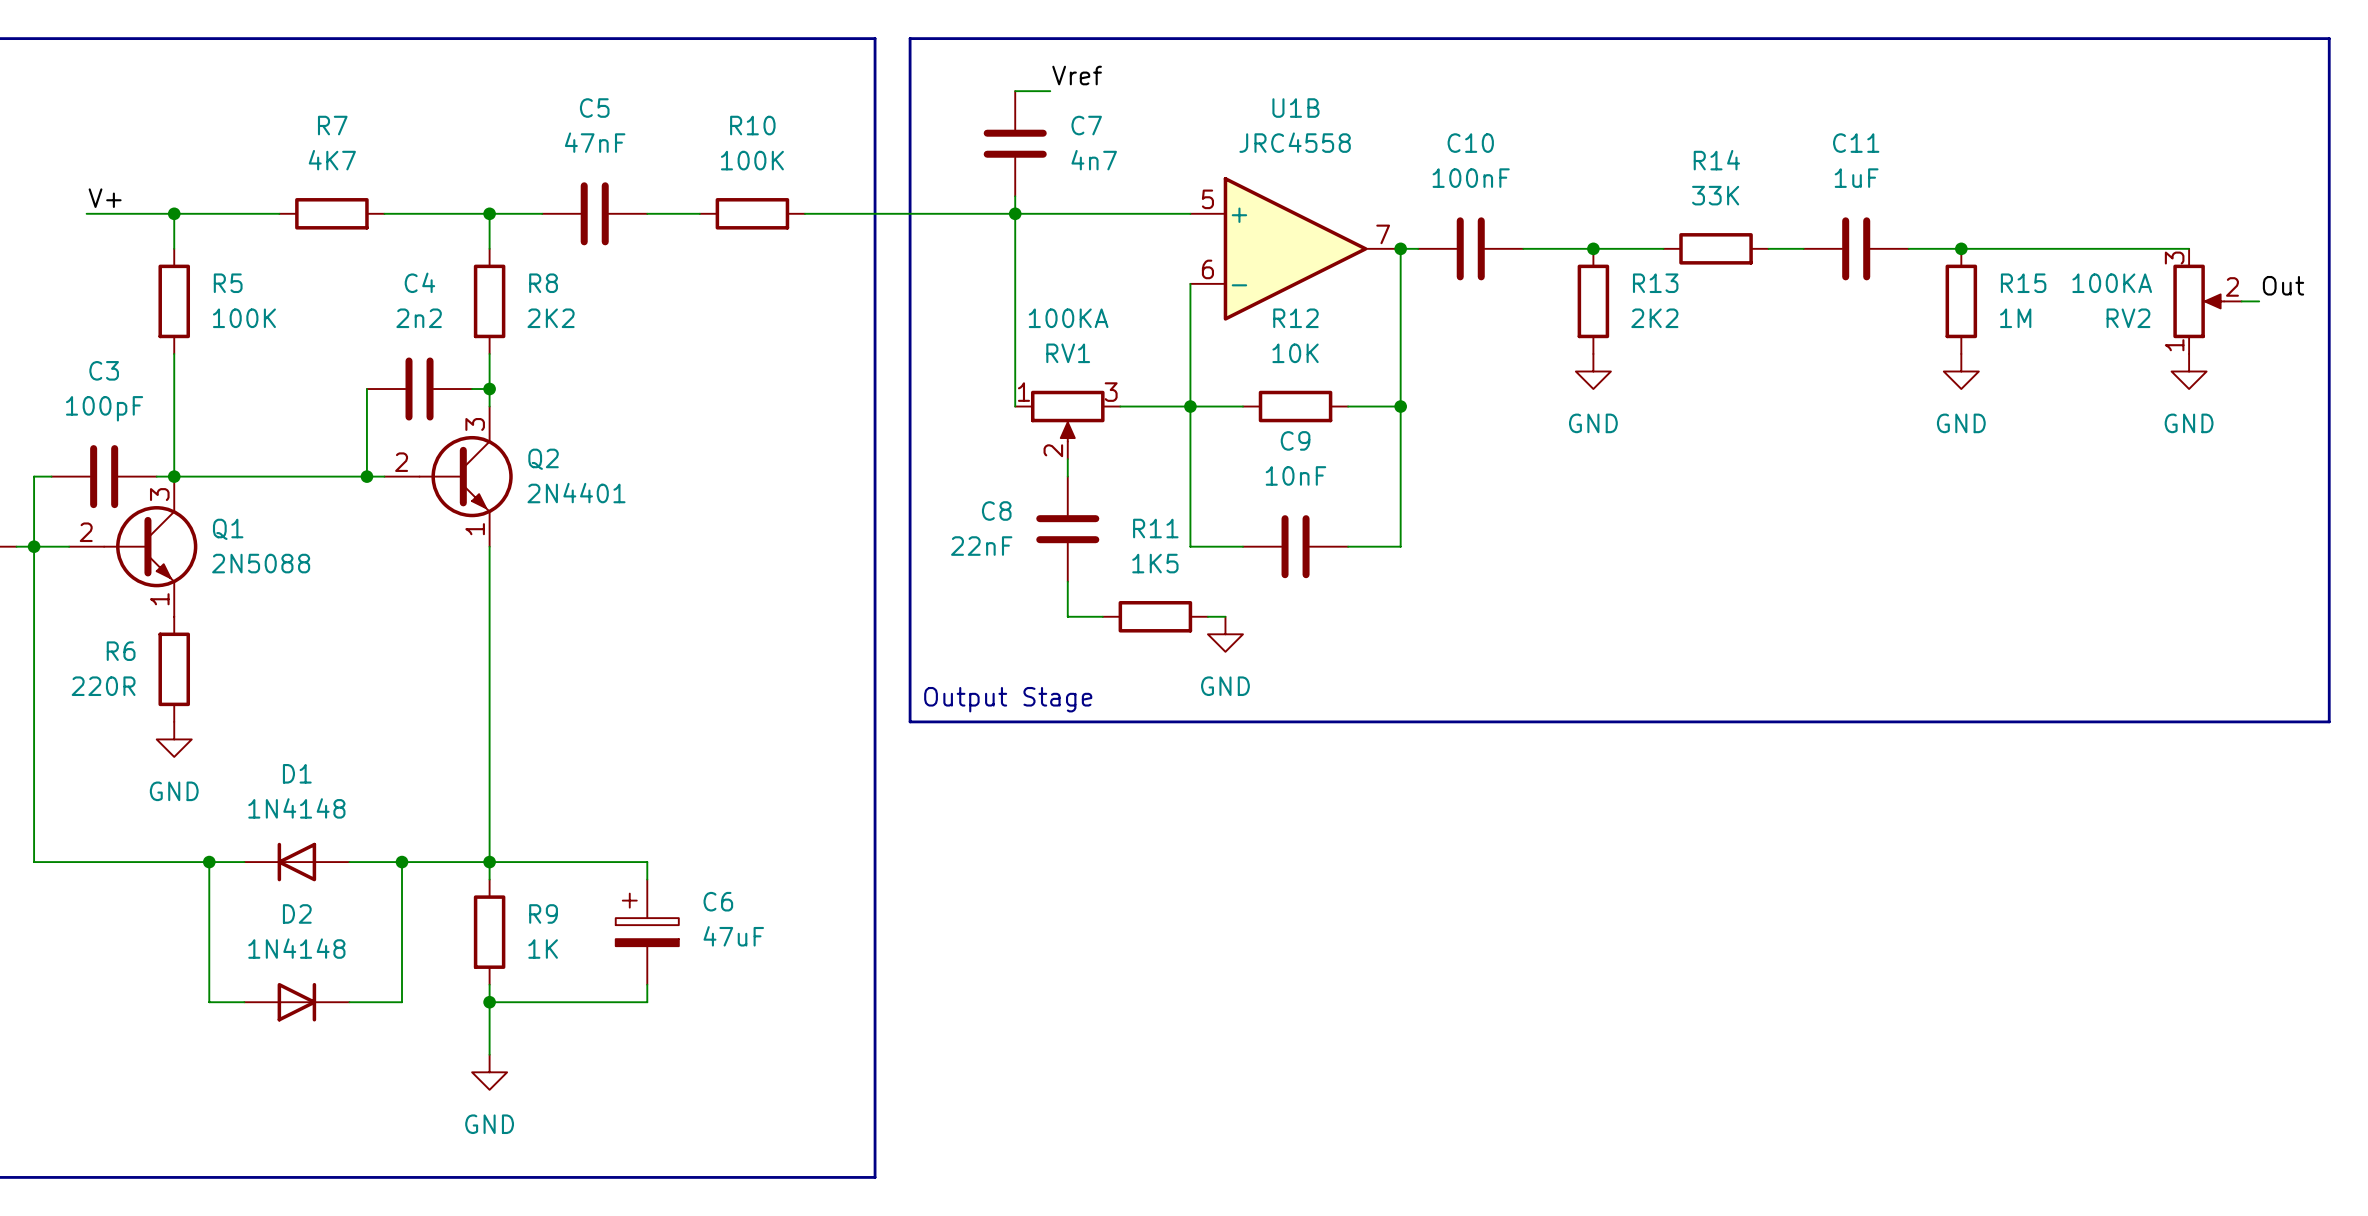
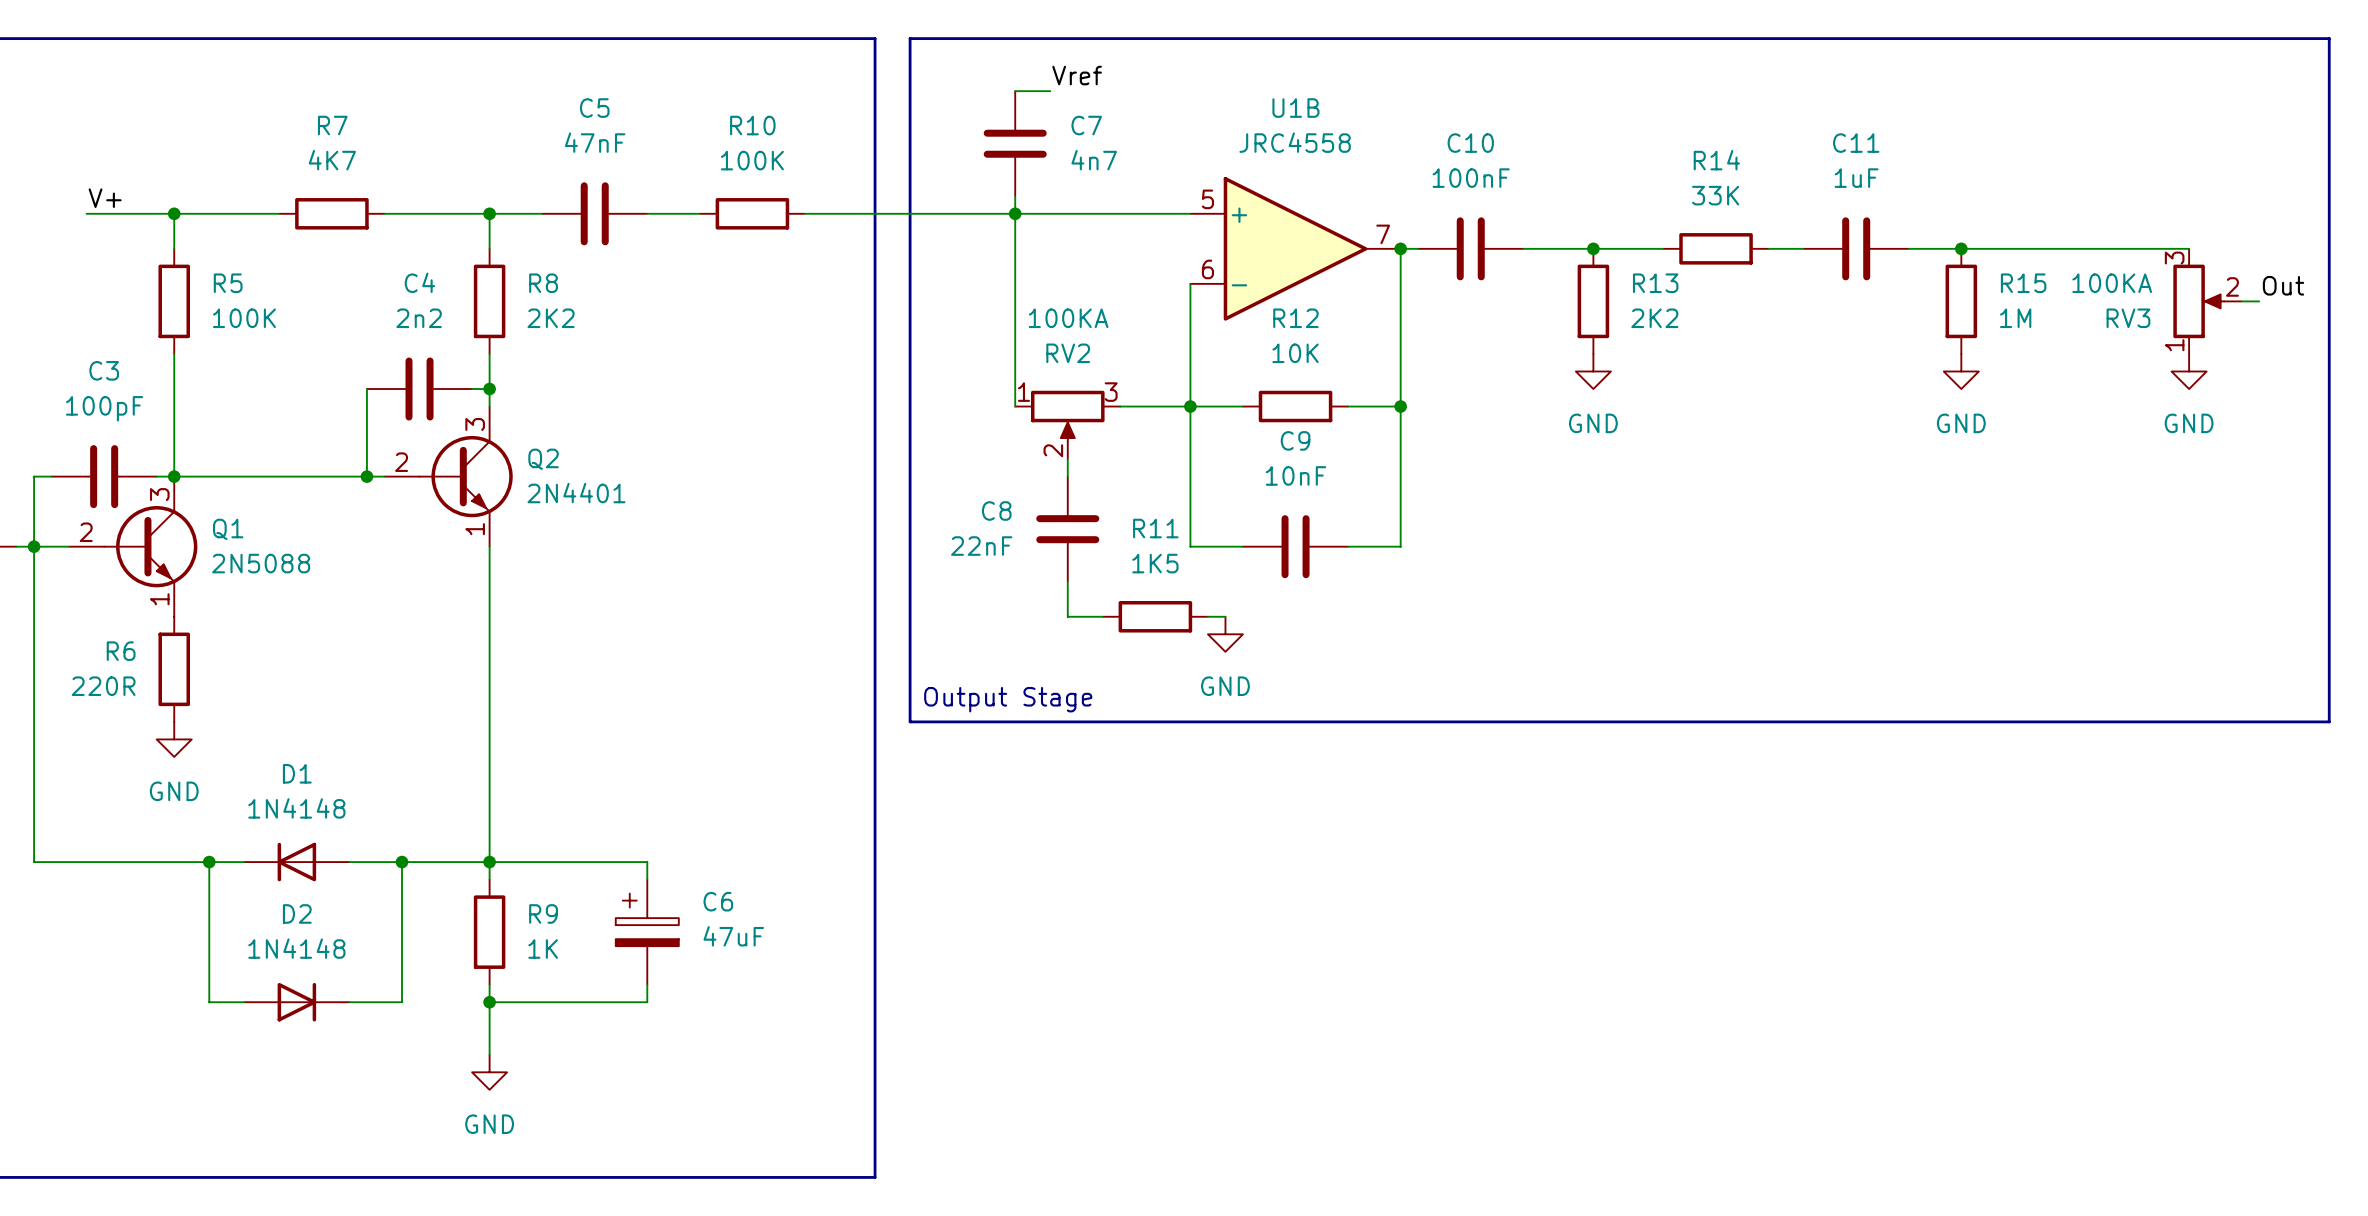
RV2 name: RV2 (2128, 318) -> RV3 (2128, 318)
RV1 name: RV1 (1068, 353) -> RV2 (1068, 353)

